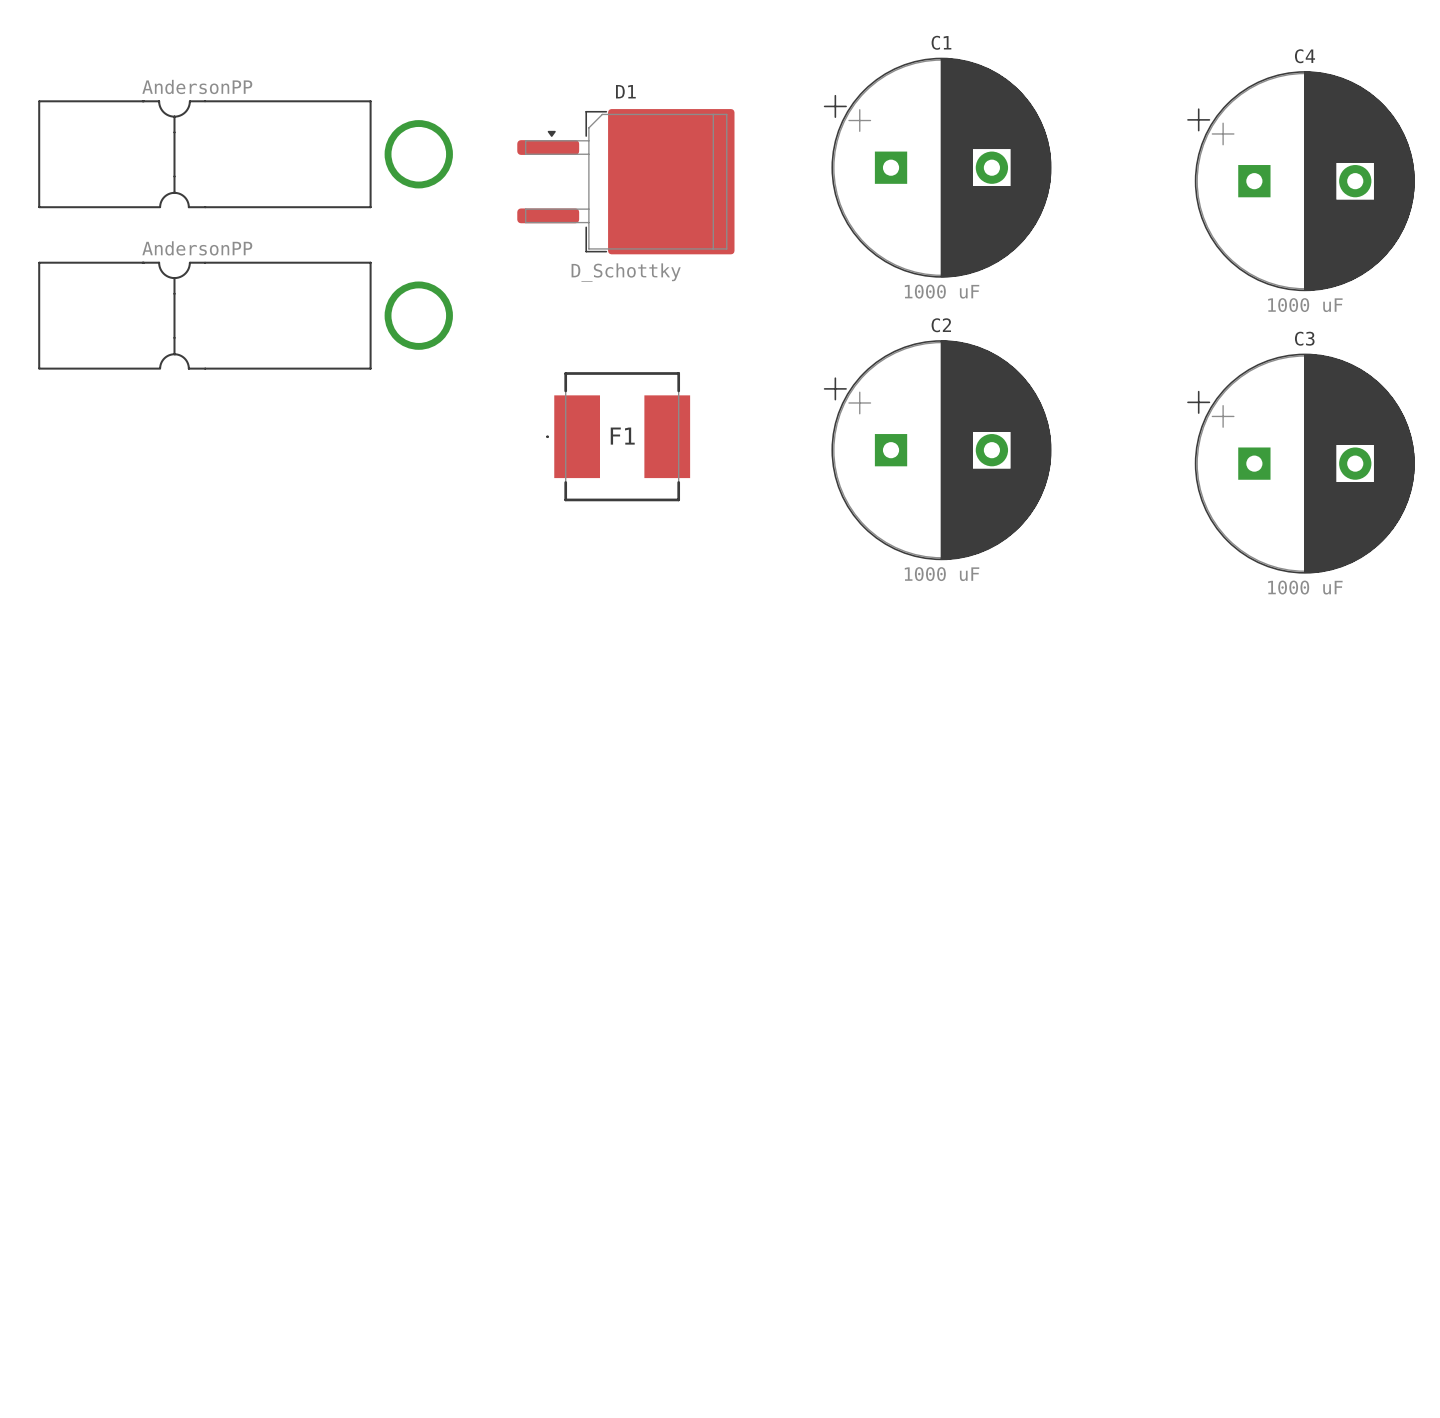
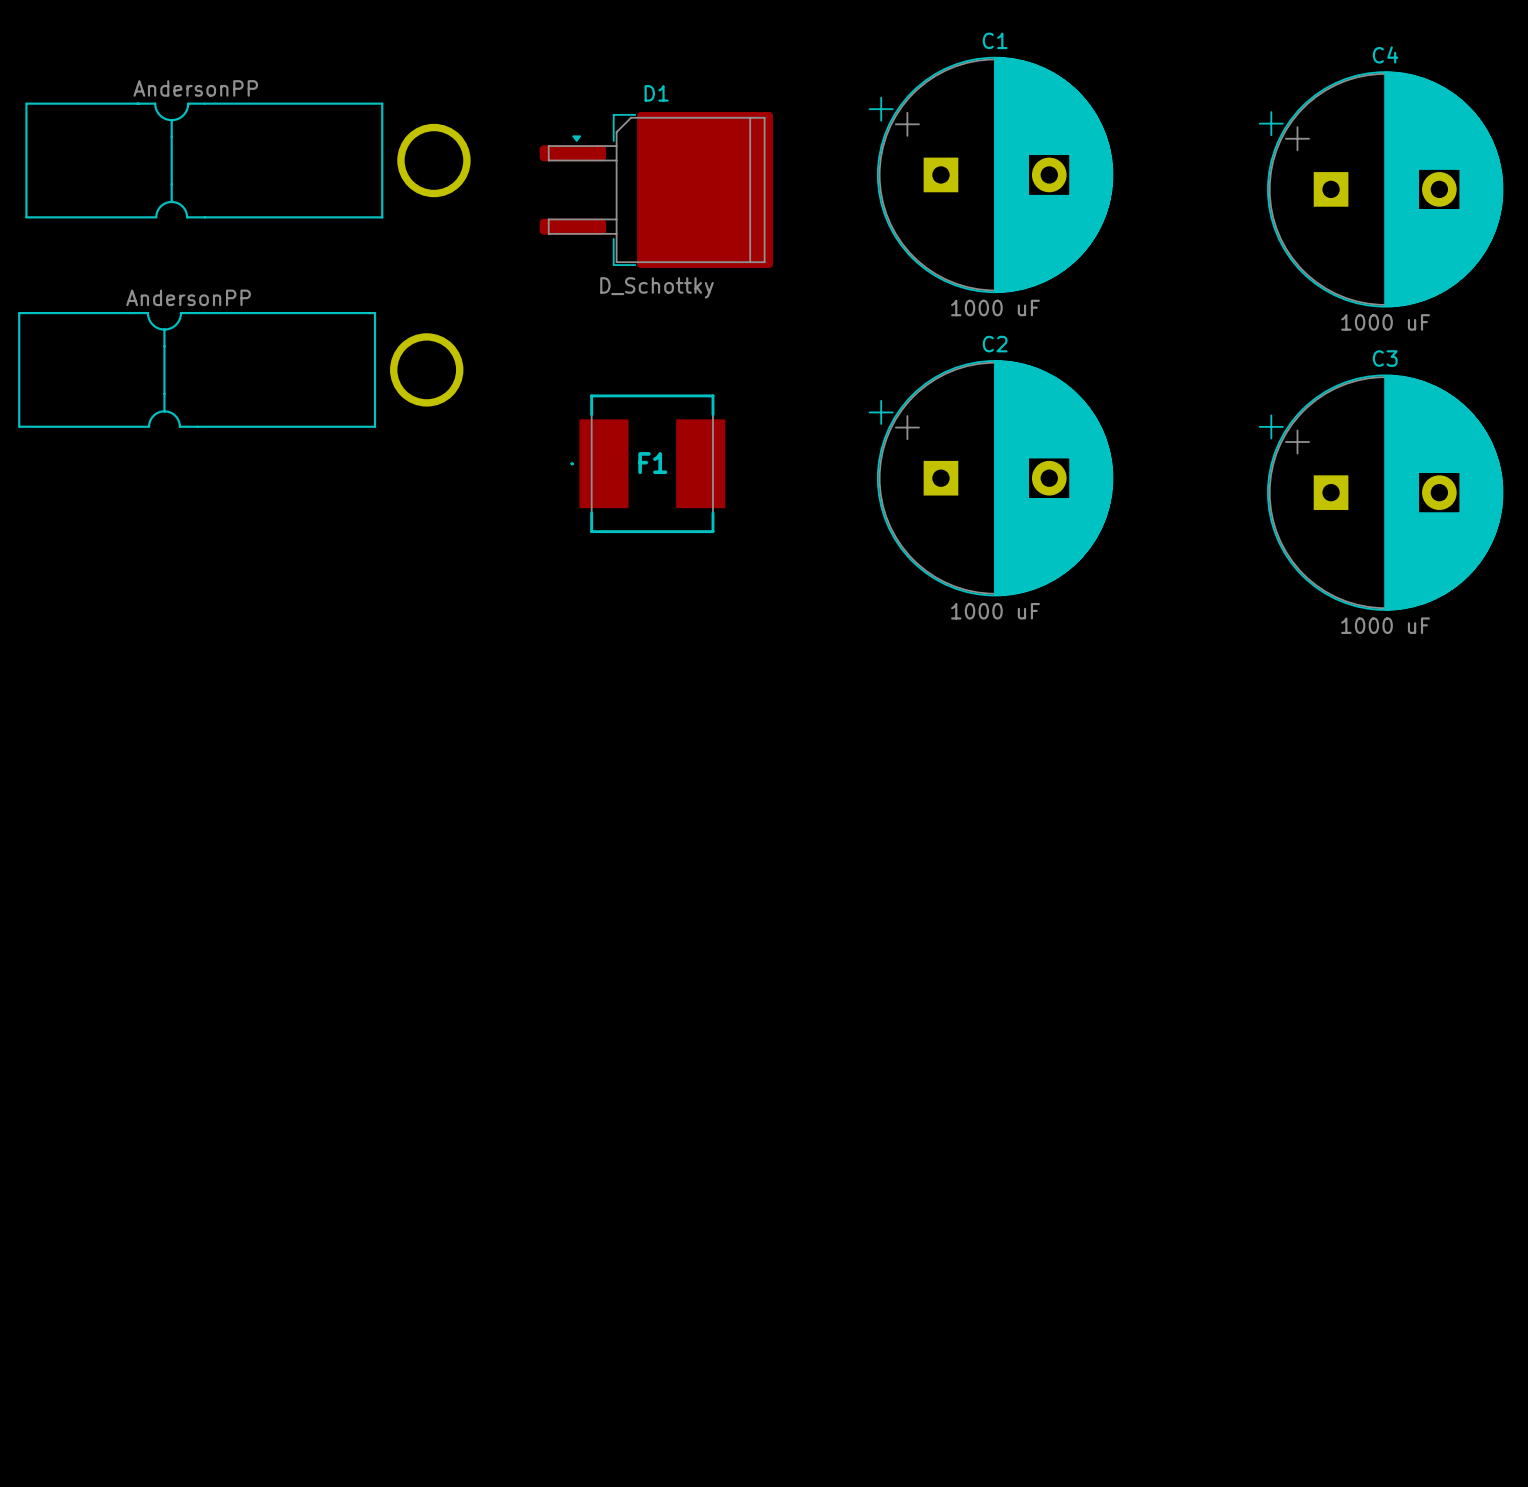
part position: (245, 315) -> (240, 369)

